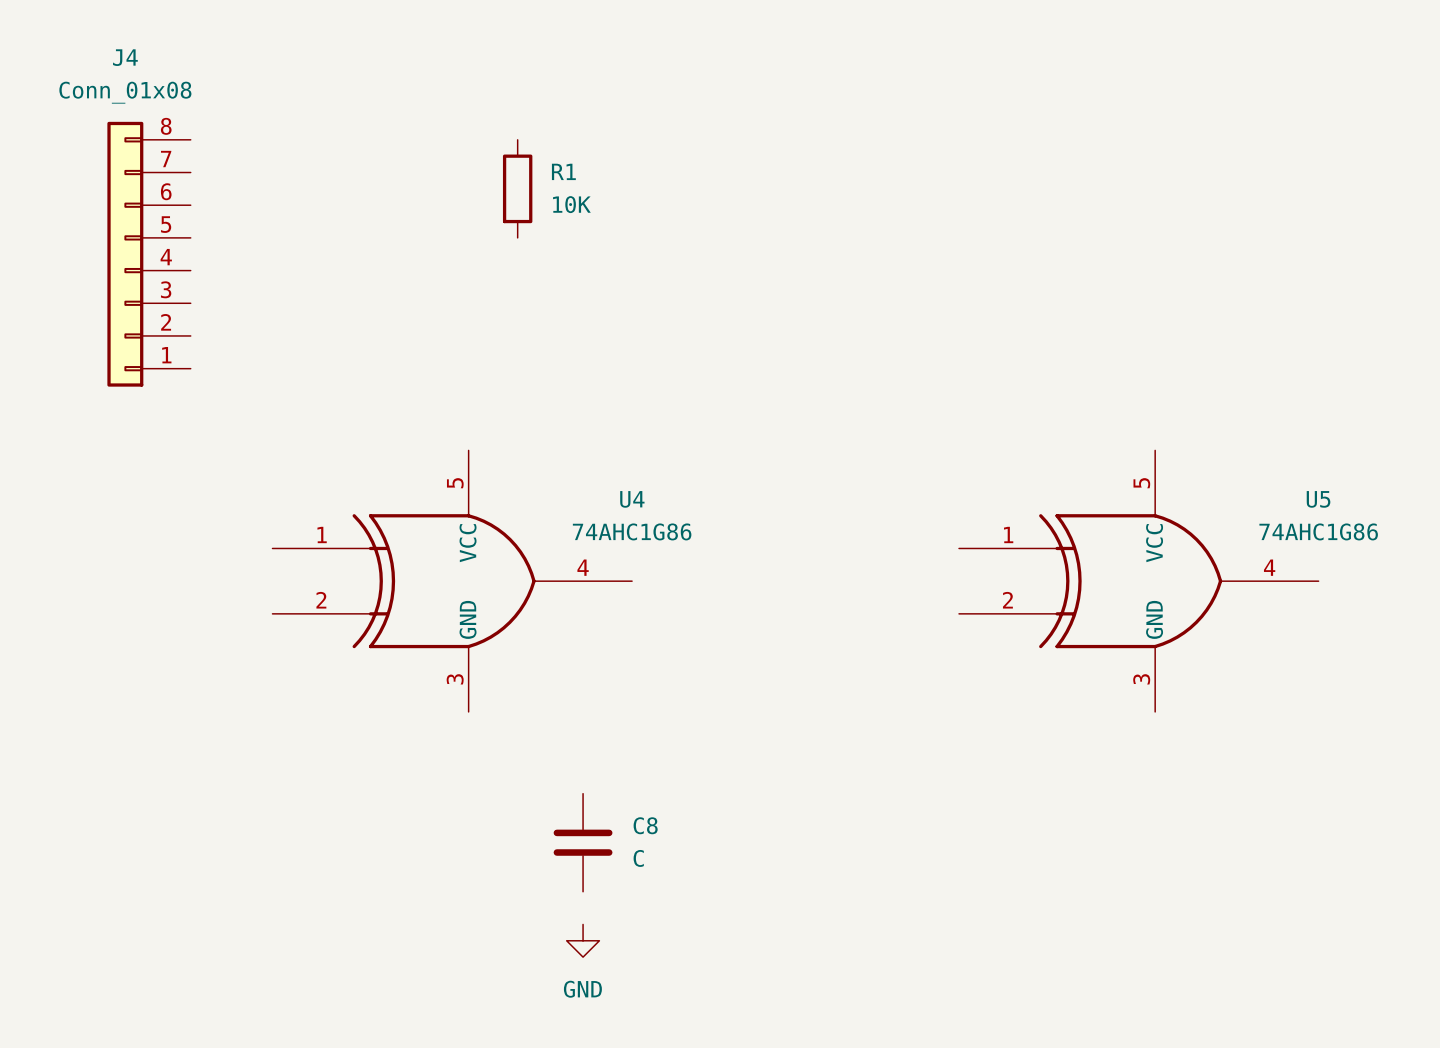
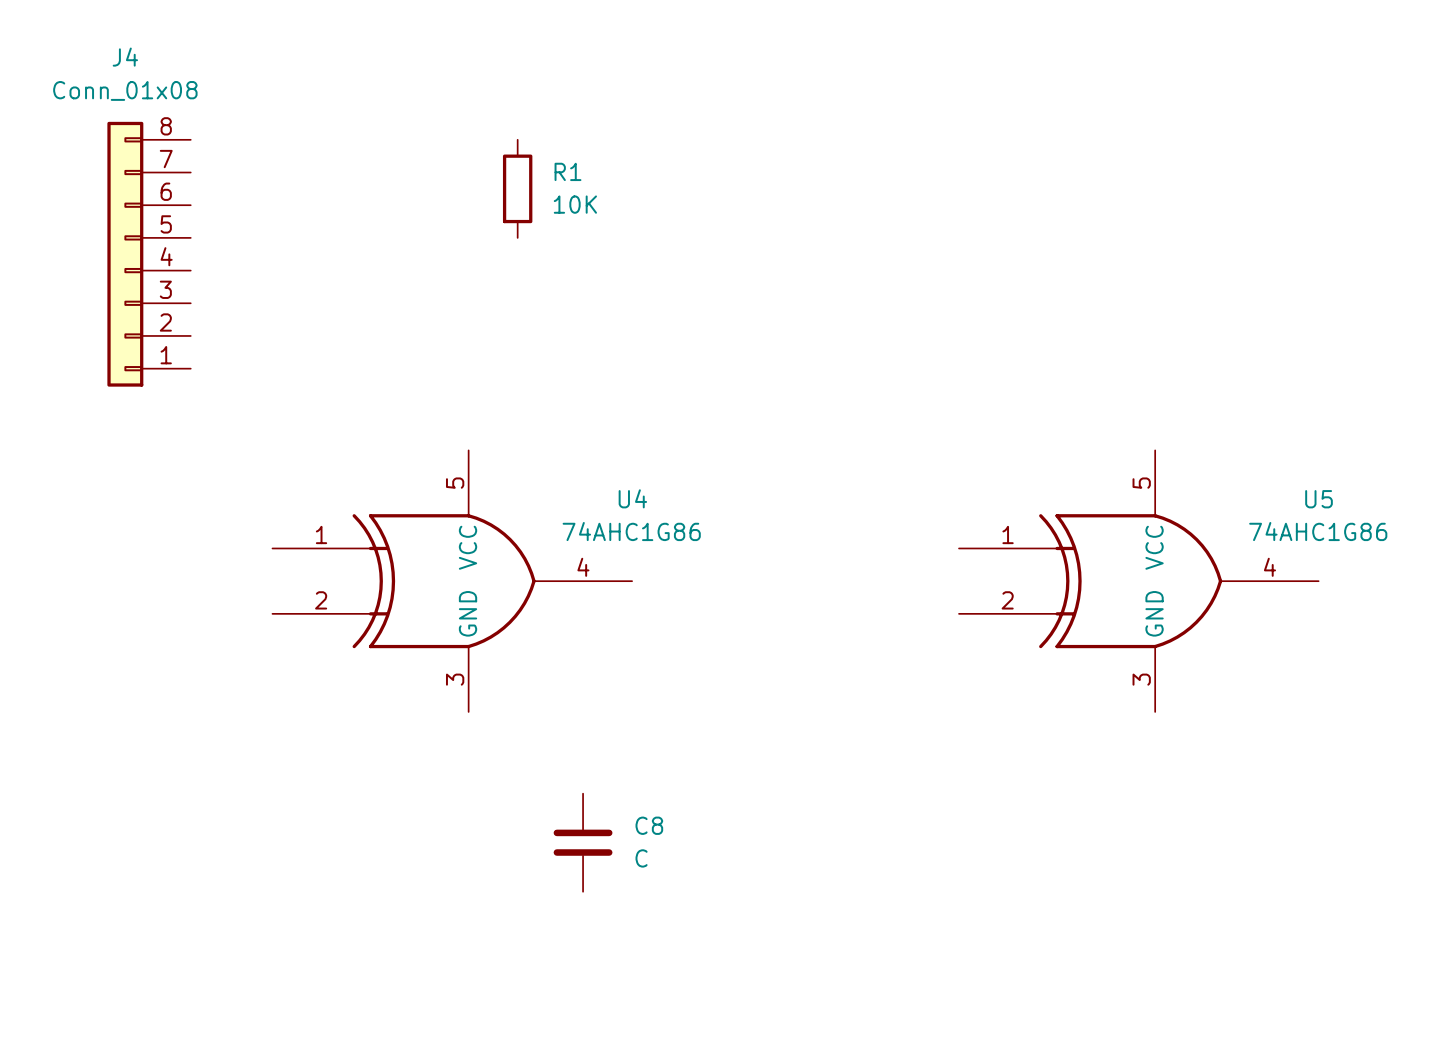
power symbol: GND (583, 940) -> none

